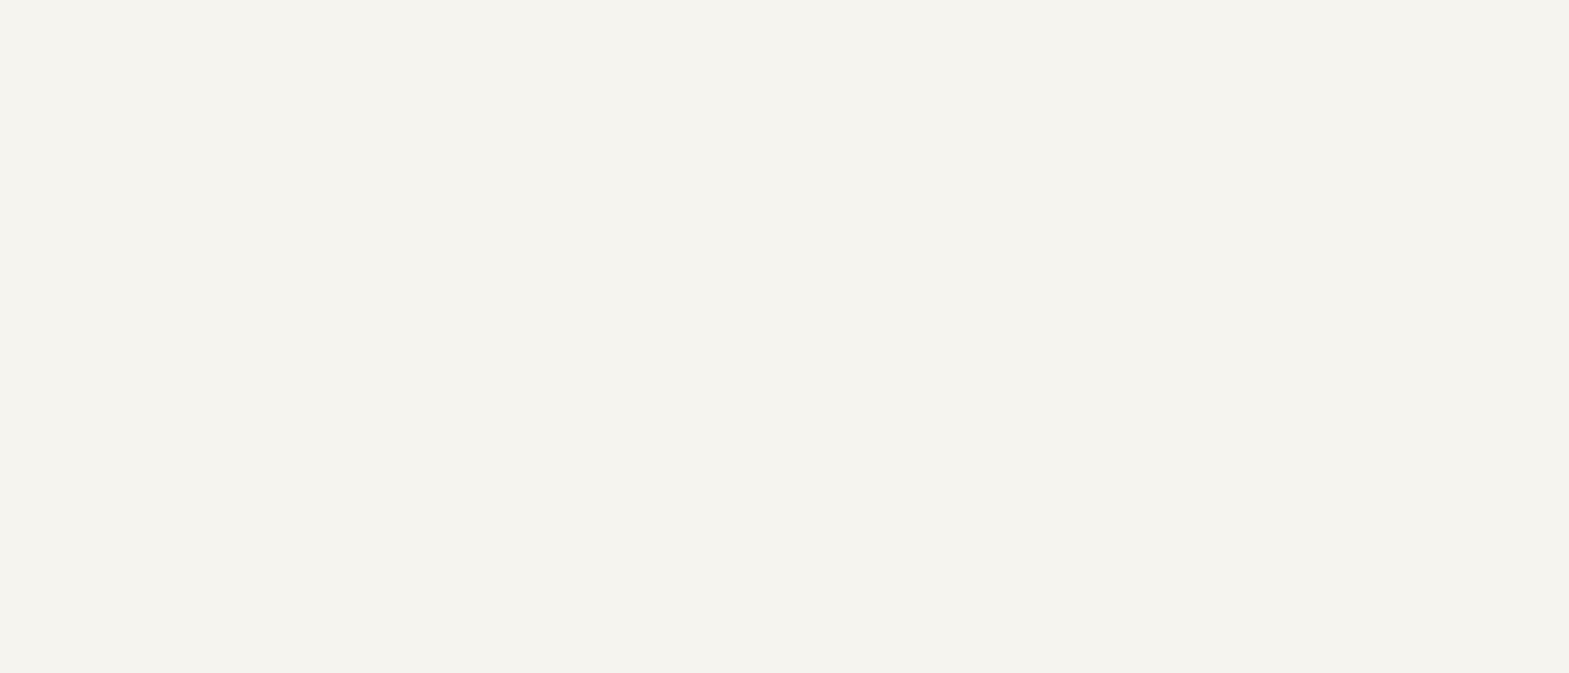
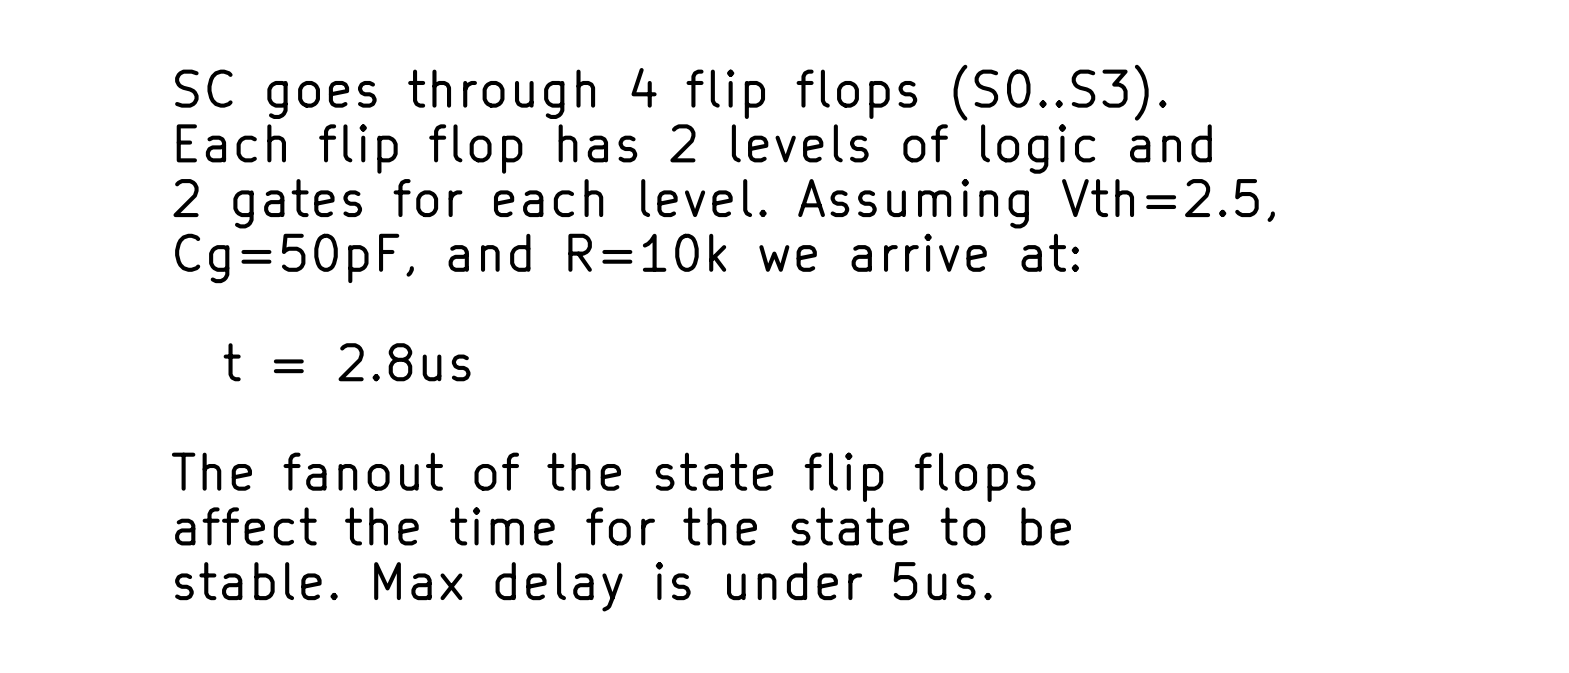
text: none -> SC goes through 4 flip flops (S0..S3). (670, 92)
text: none -> Each flip flop has 2 levels of logic and (694, 149)
text: none -> 2 gates for each level. Assuming Vth=2.5, (724, 203)
text: none -> Cg=50pF, and R=10k we arrive at: (627, 258)
text: none -> t = 2.8us (347, 362)
text: none -> The fanout of the state flip flops (603, 477)
text: none -> affect the time for the state to be (623, 526)
text: none -> stable. Max delay is under 5us. (583, 586)

